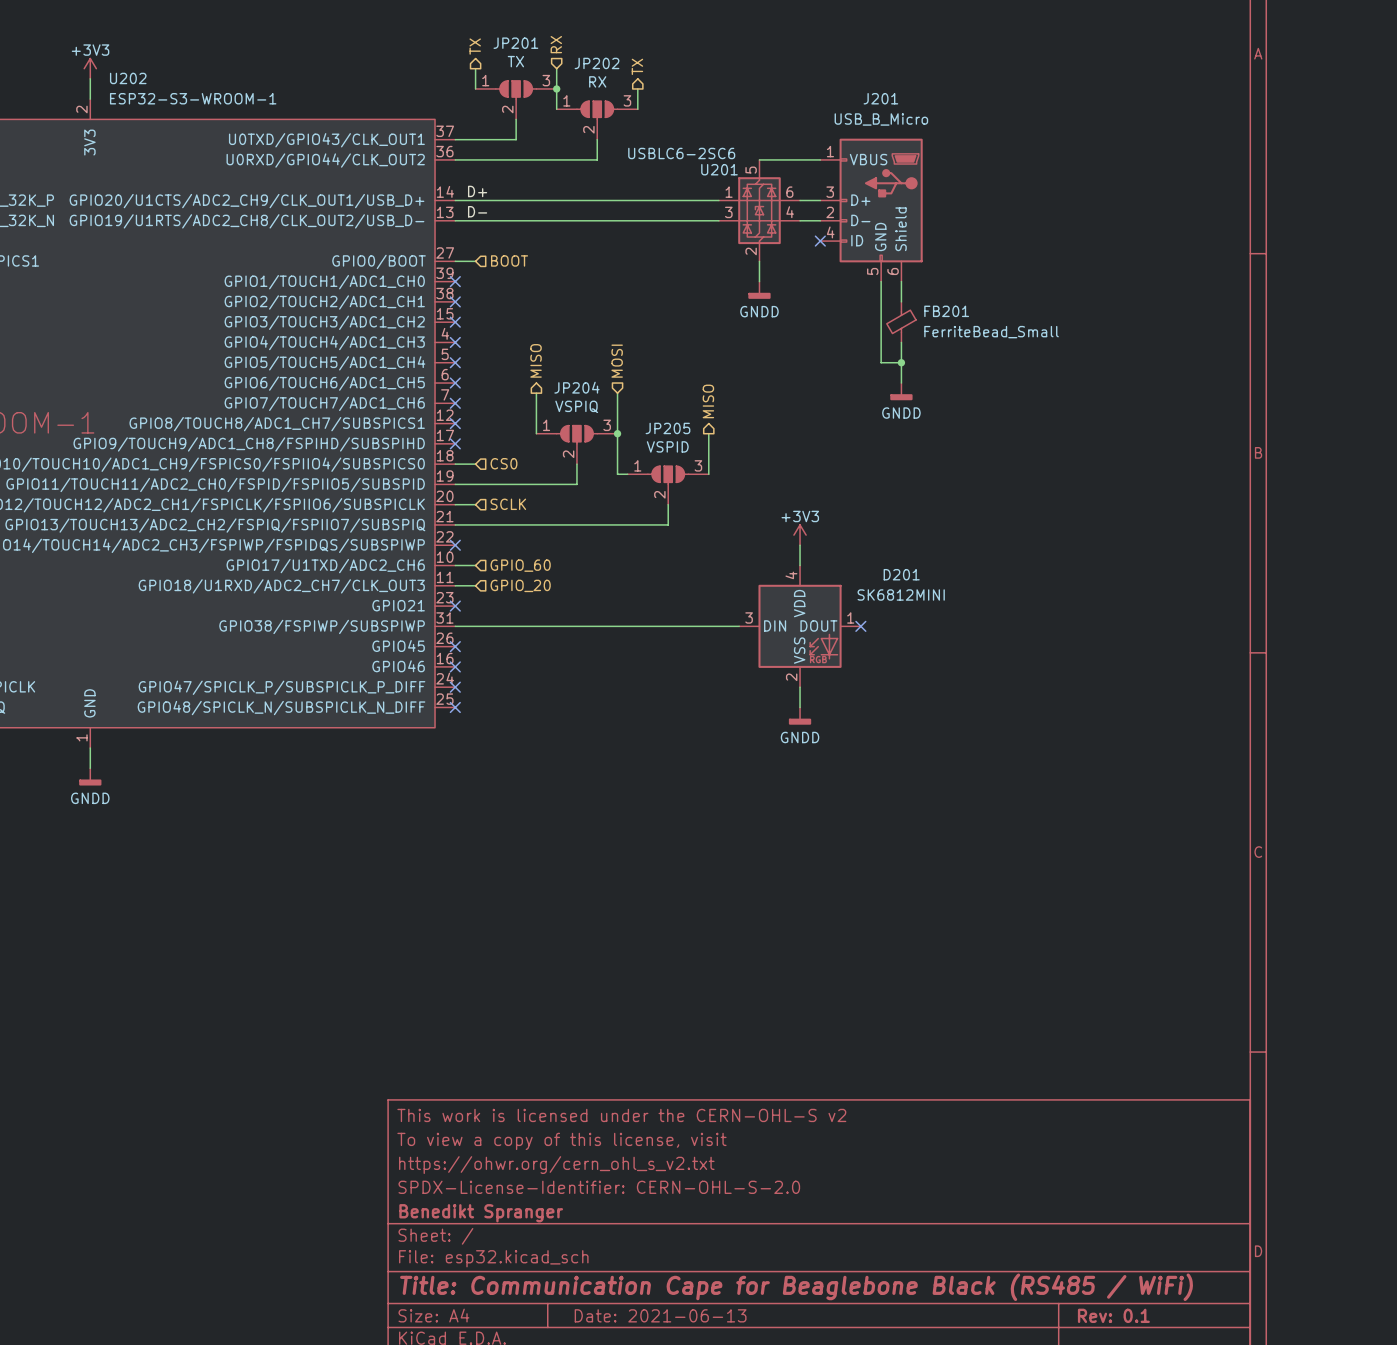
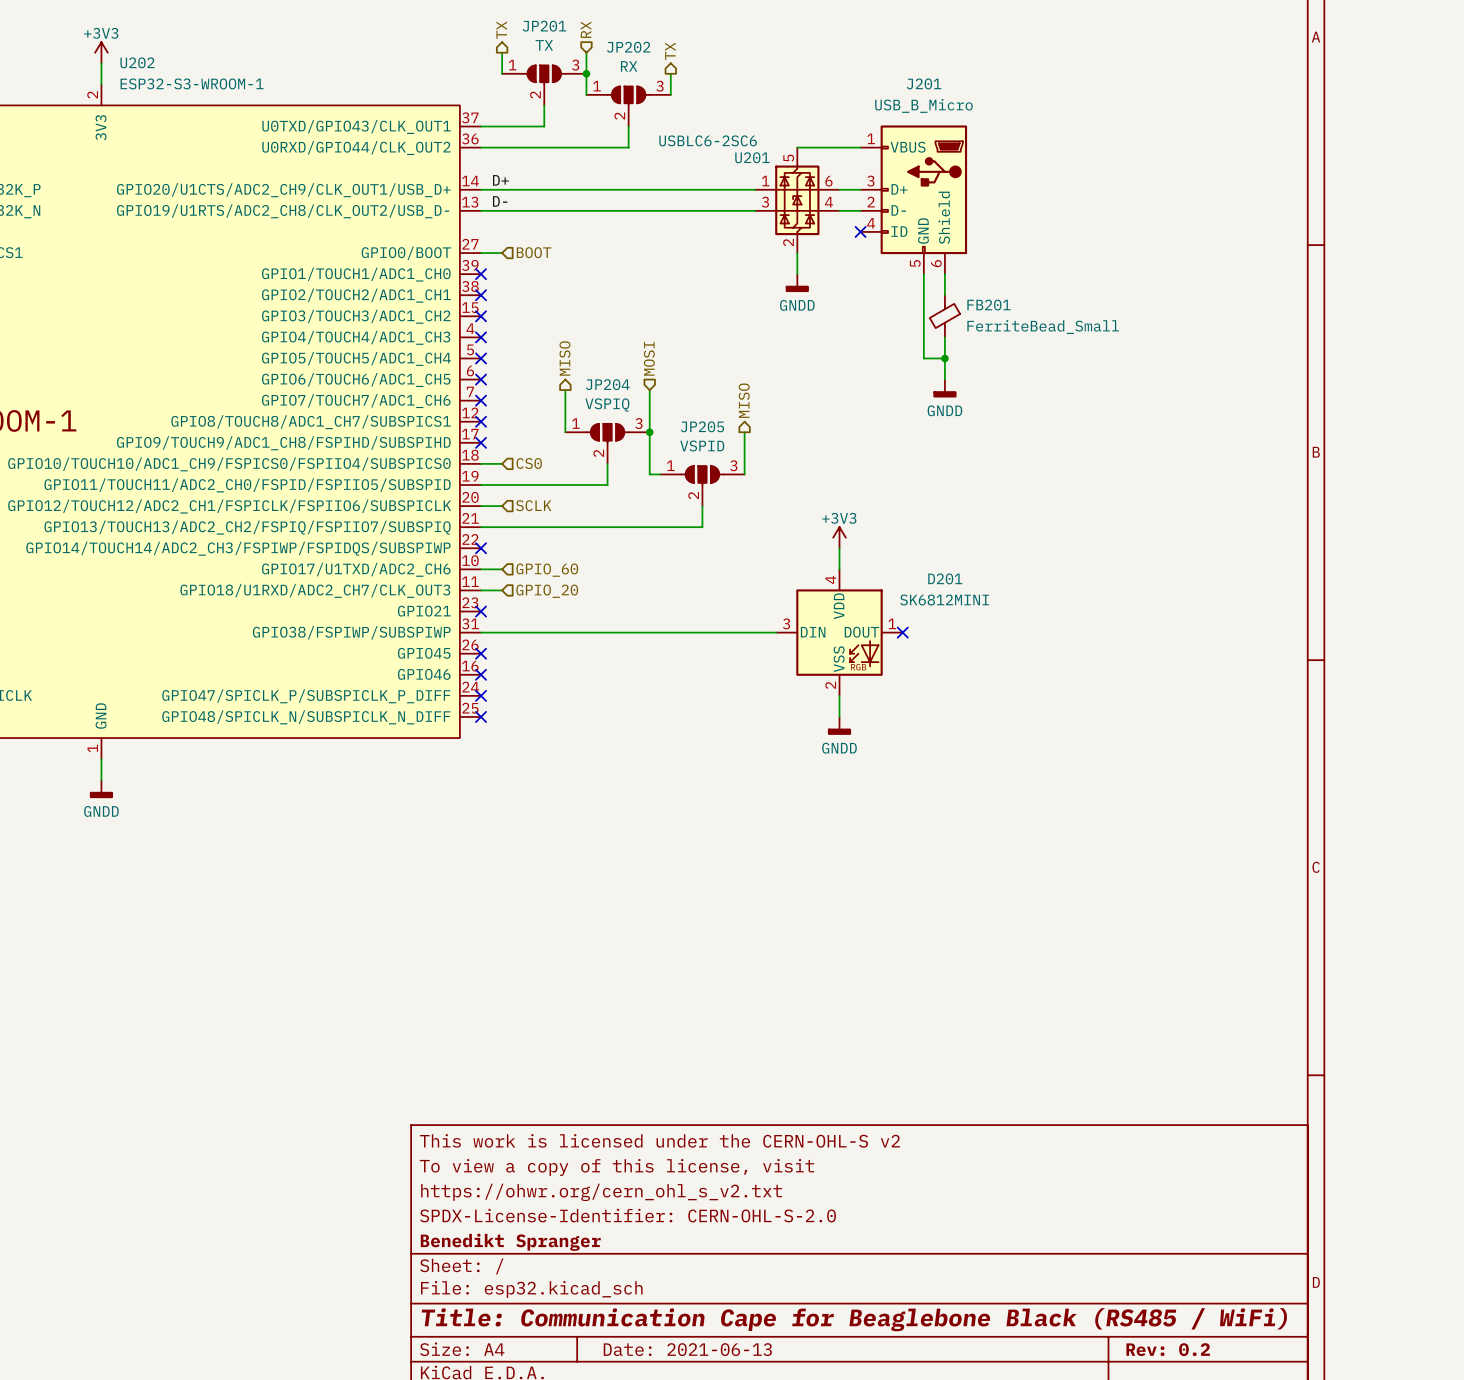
title block: Rev: 0.1 (1113, 1315) -> Rev: 0.2 (1168, 1349)

